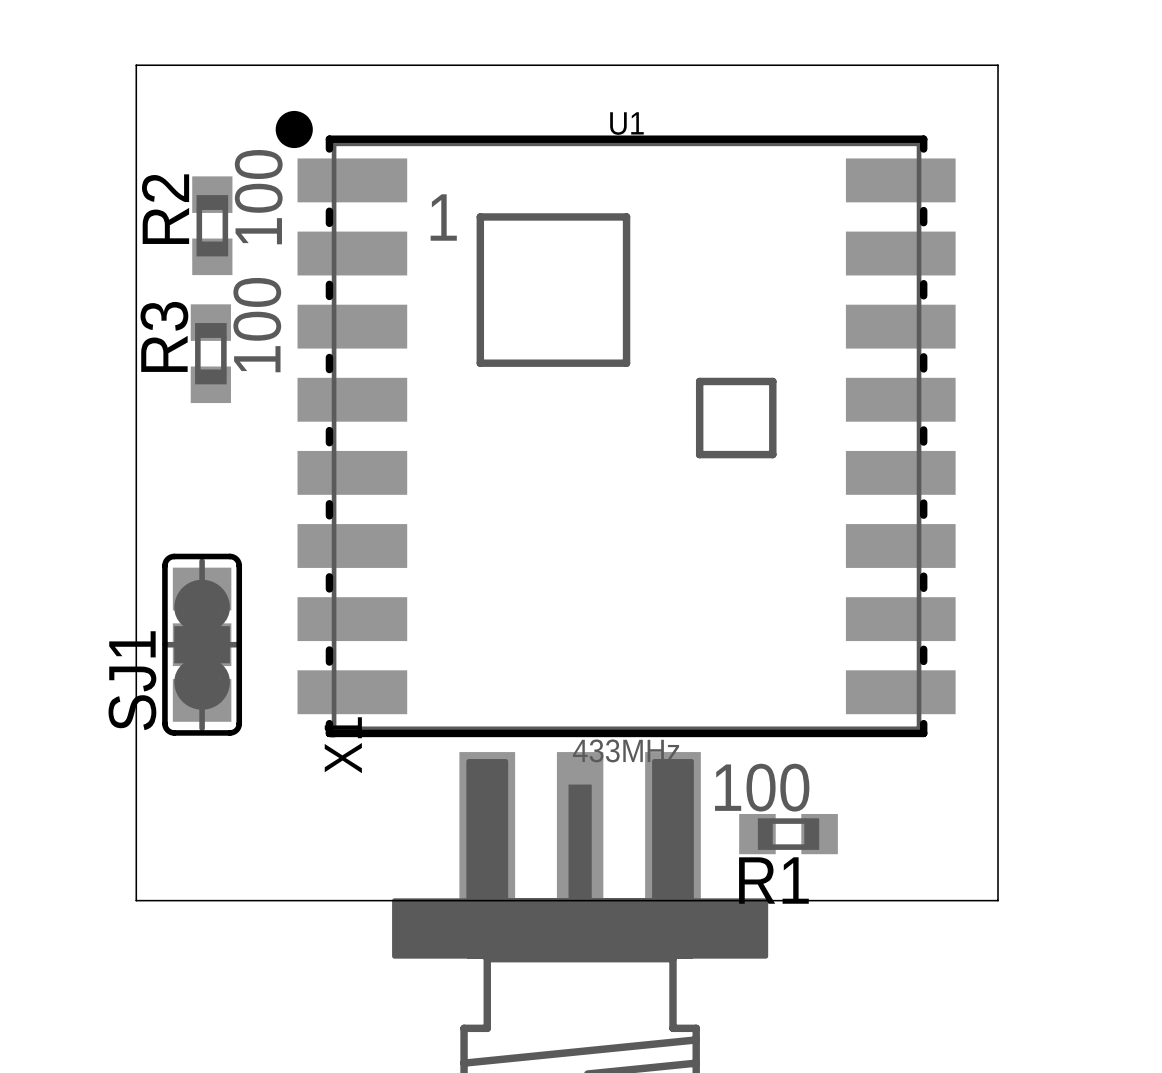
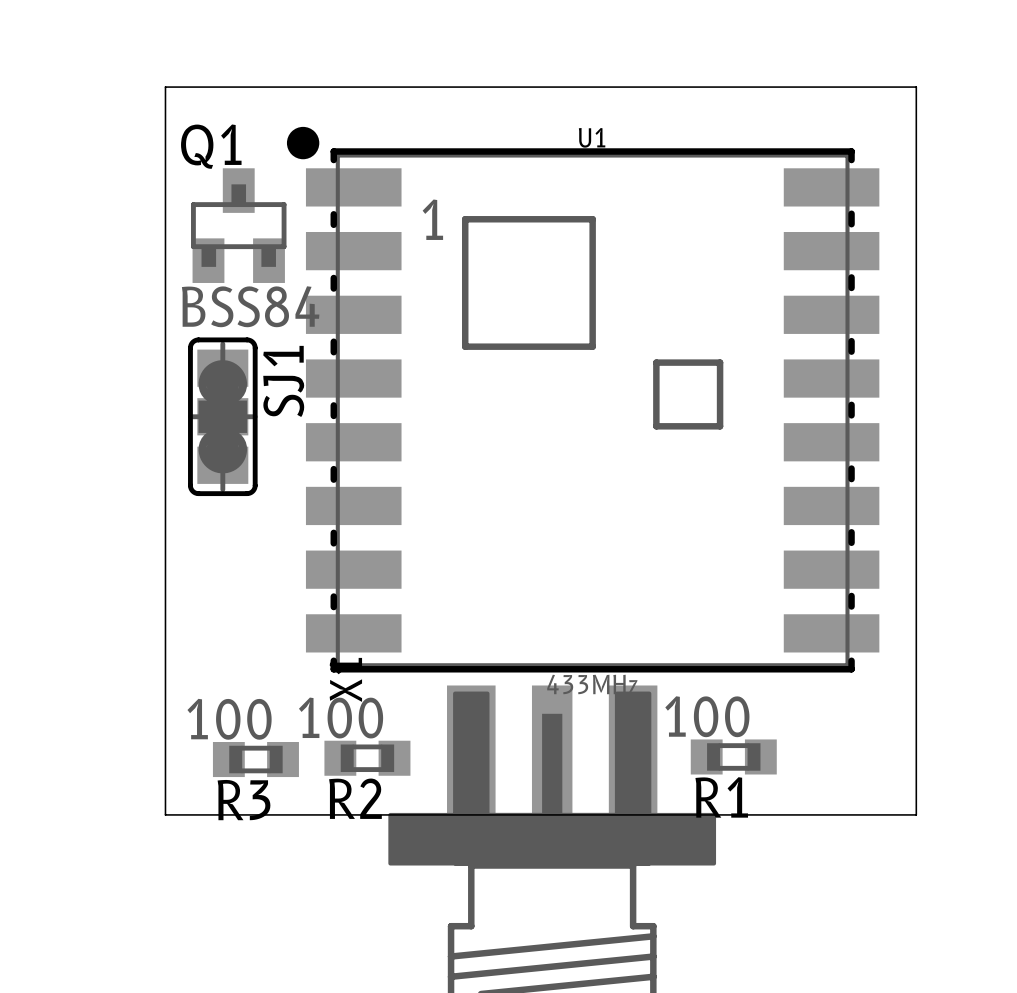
R2 value position: 100 (258, 197) -> 100 (341, 718)
R2 name position: R2 (165, 209) -> R2 (355, 798)
Q1: none -> BSS84 (238, 225)
R2 rotation: 0° (212, 225) -> 90° clockwise (367, 758)
R2 position: (212, 225) -> (367, 758)
R3 value position: 100 (257, 325) -> 100 (229, 719)
R3 name position: R3 (164, 336) -> R3 (243, 800)
R3 rotation: 0° (210, 353) -> 90° clockwise (255, 759)
R3 position: (210, 353) -> (255, 759)
SJ1 position: (202, 644) -> (222, 416)
SJ1 name position: SJ1 (132, 680) -> SJ1 (283, 381)

